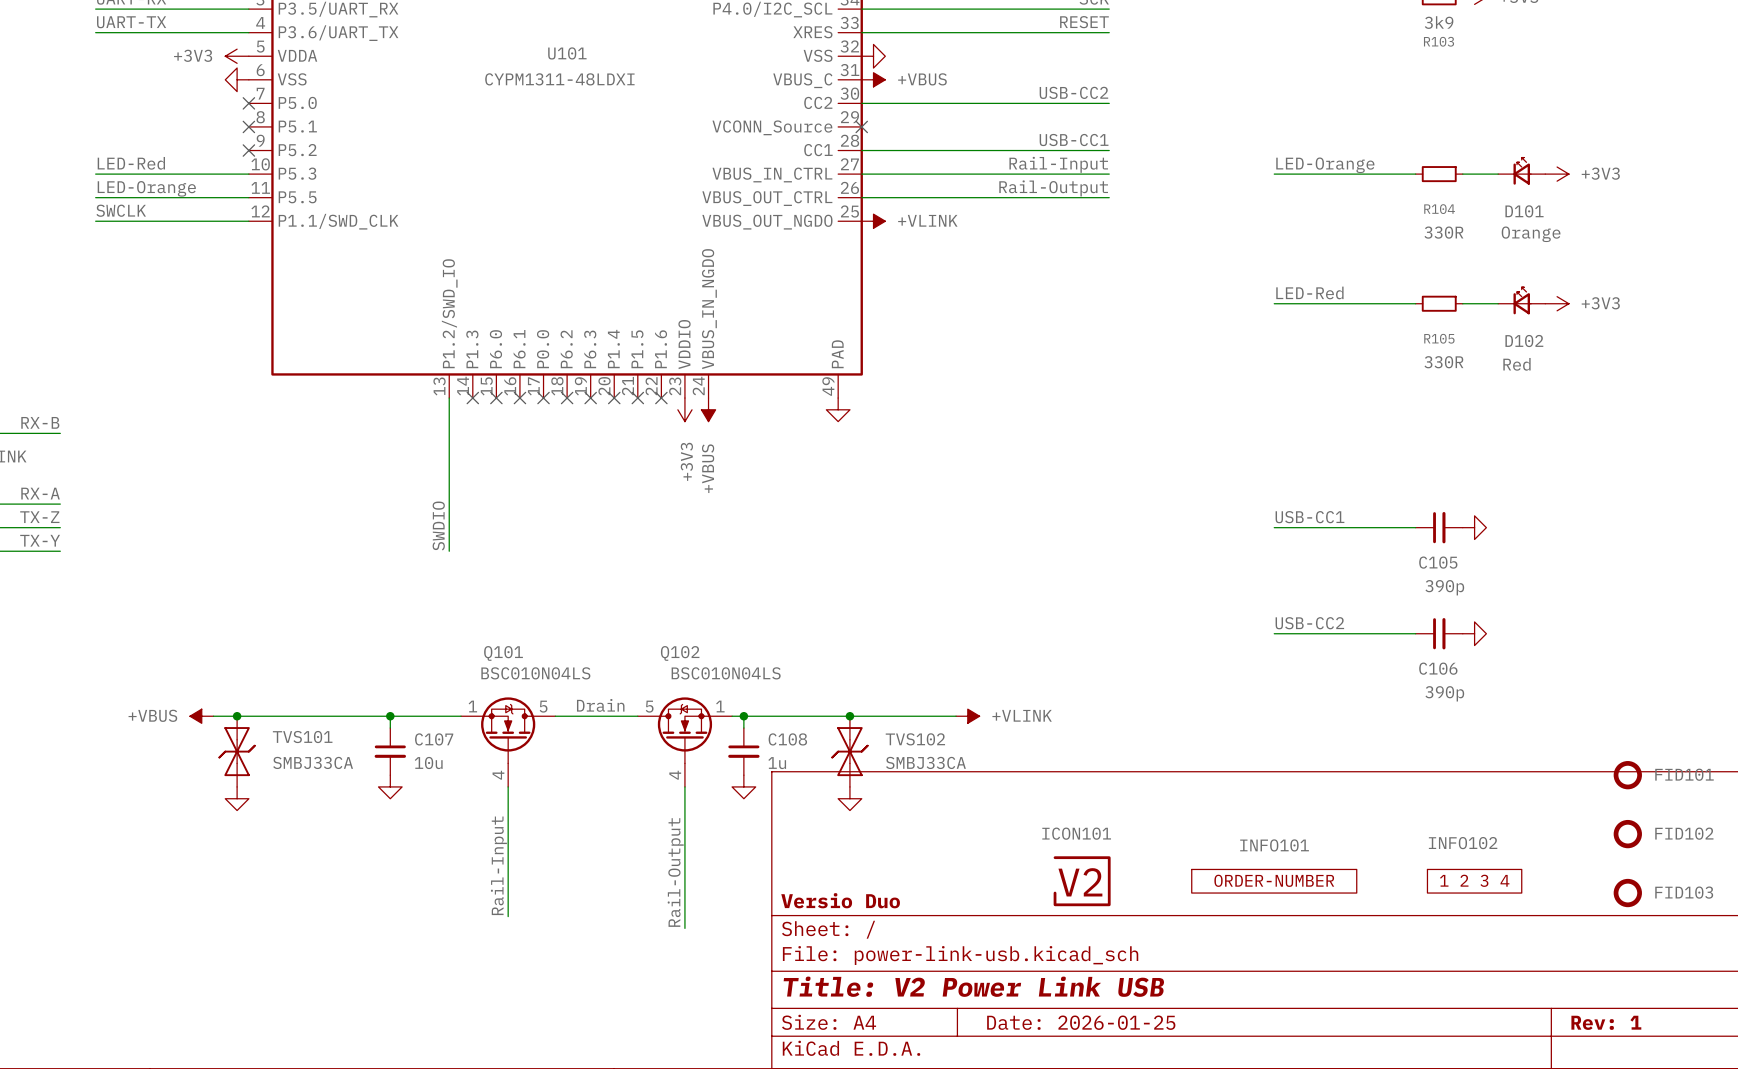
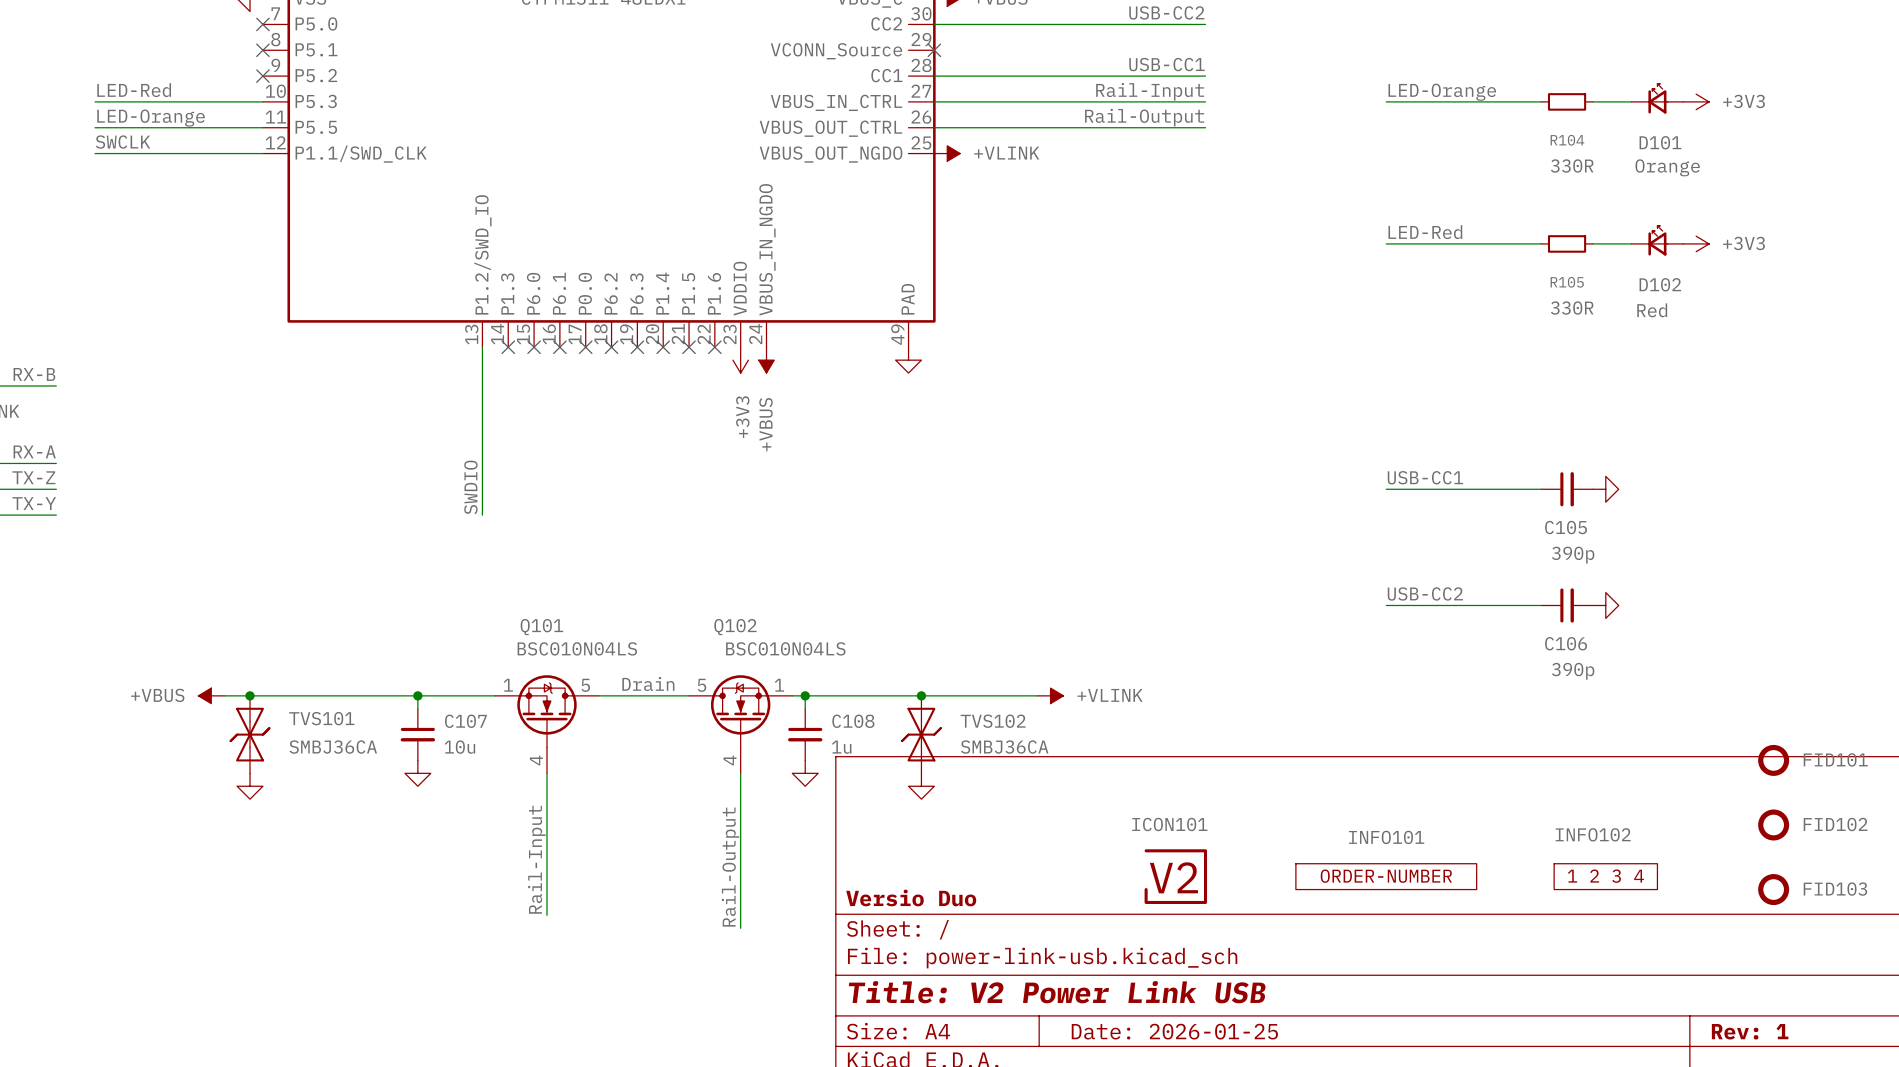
TVS101 value: SMBJ33CA (313, 762) -> SMBJ36CA (333, 747)
TVS102 value: SMBJ33CA (925, 762) -> SMBJ36CA (1004, 747)

